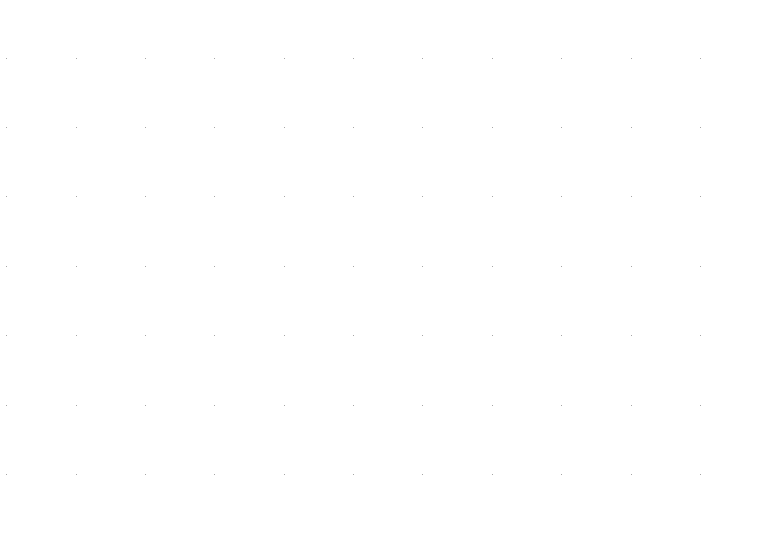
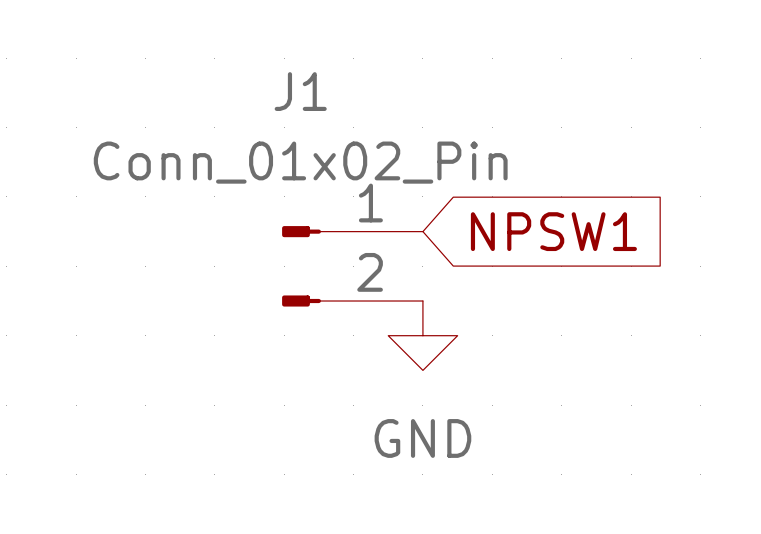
global label: none -> NPSW1 (553, 231)
J1: none -> Conn_01x02_Pin (352, 266)
power symbol: none -> GND (422, 335)

